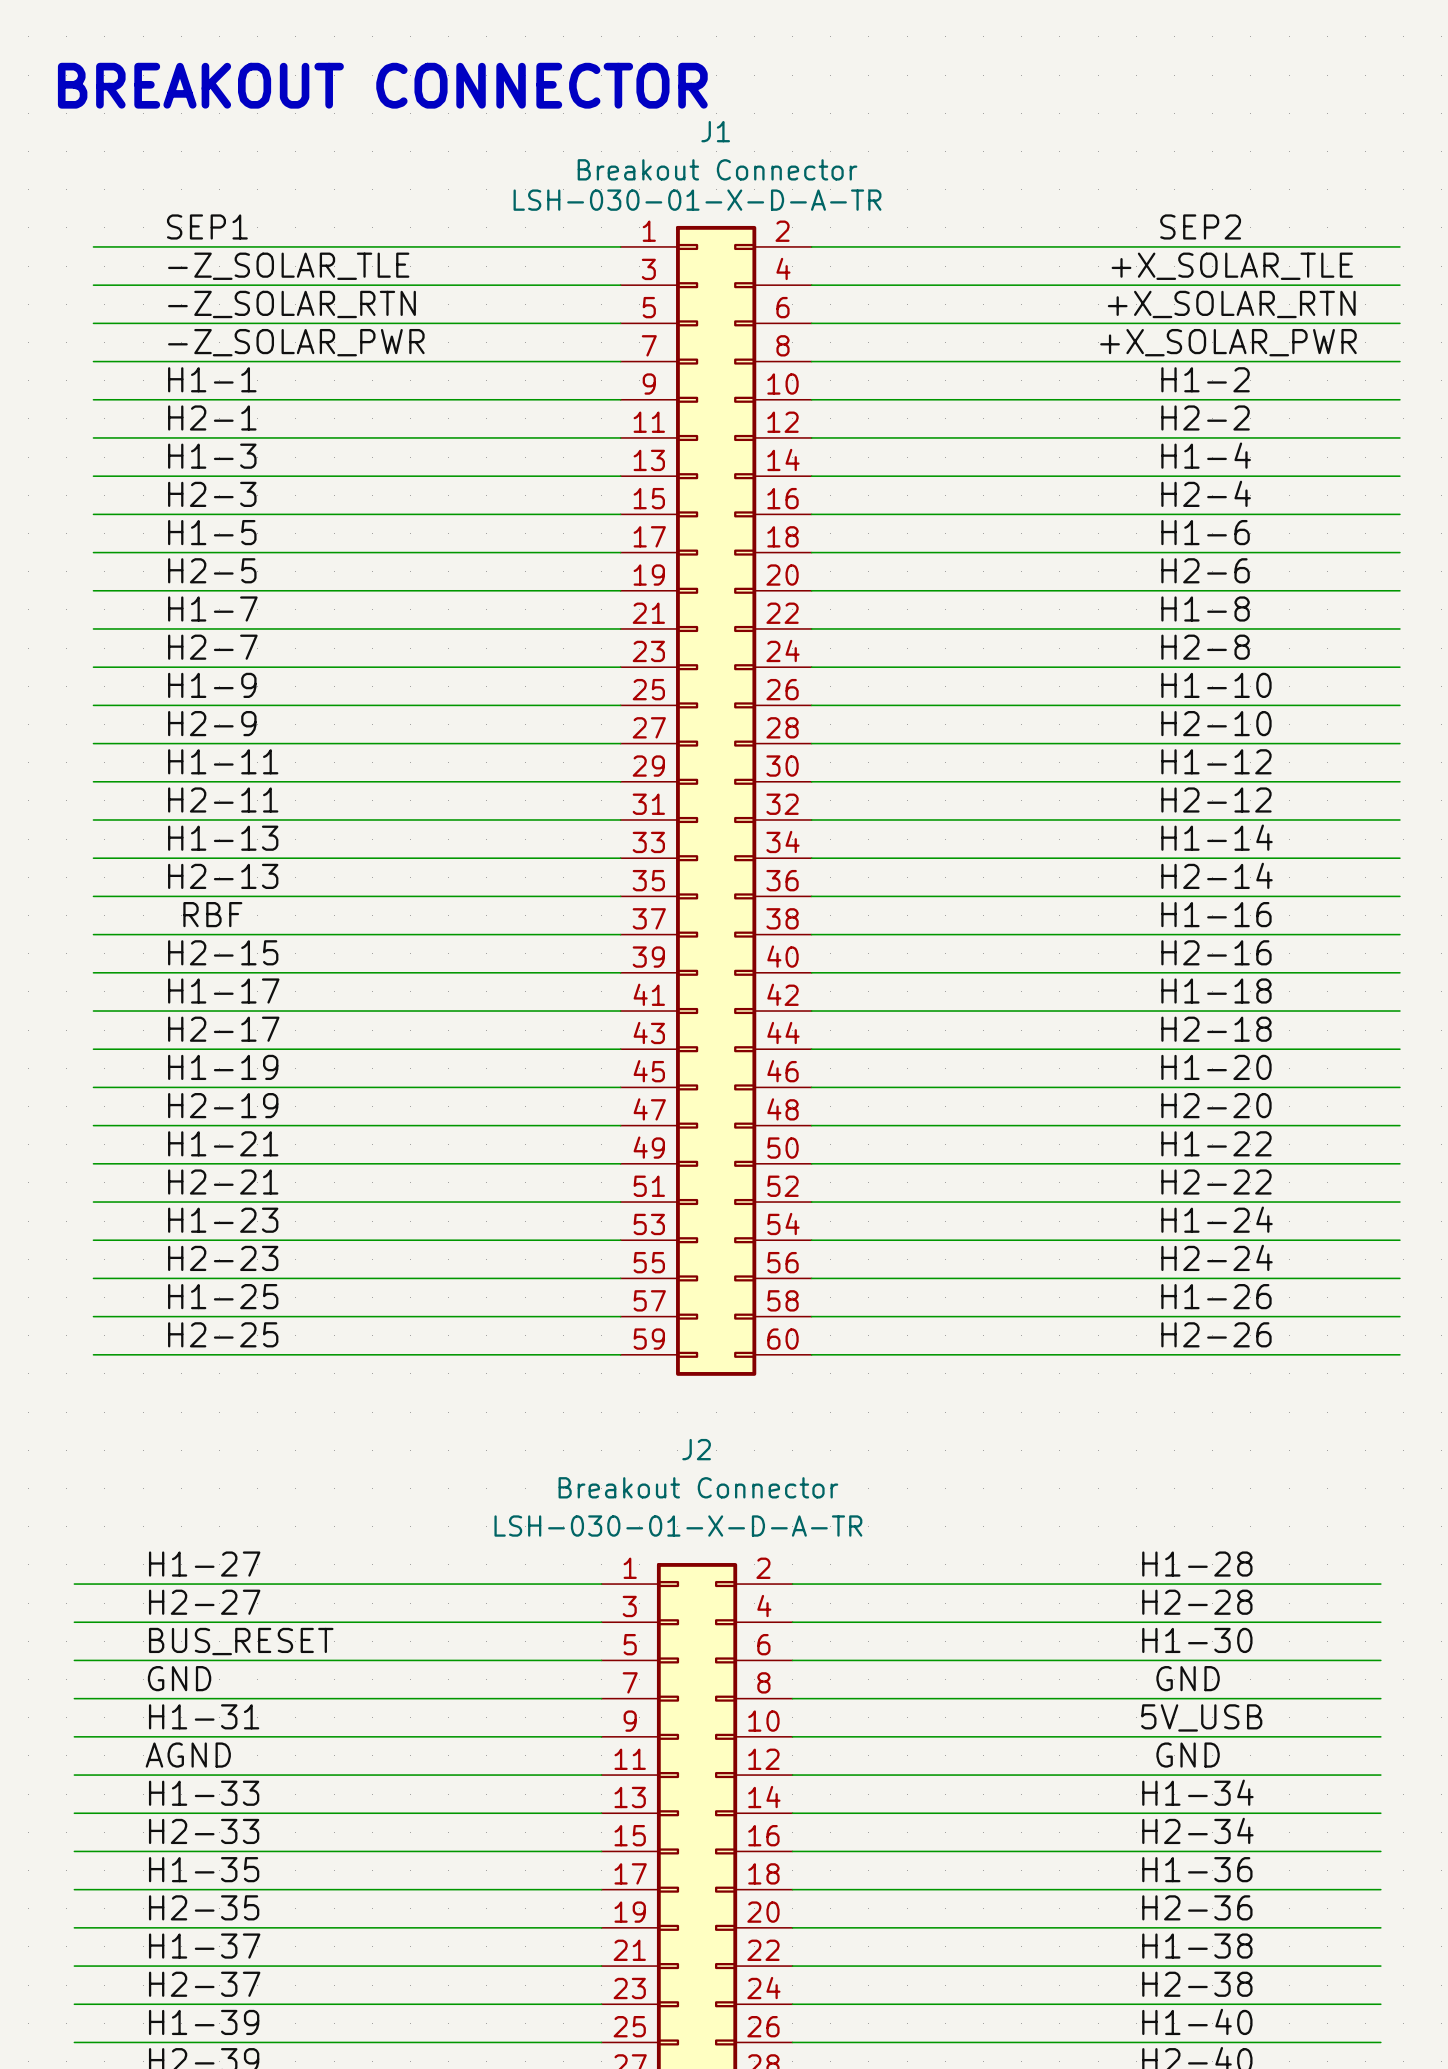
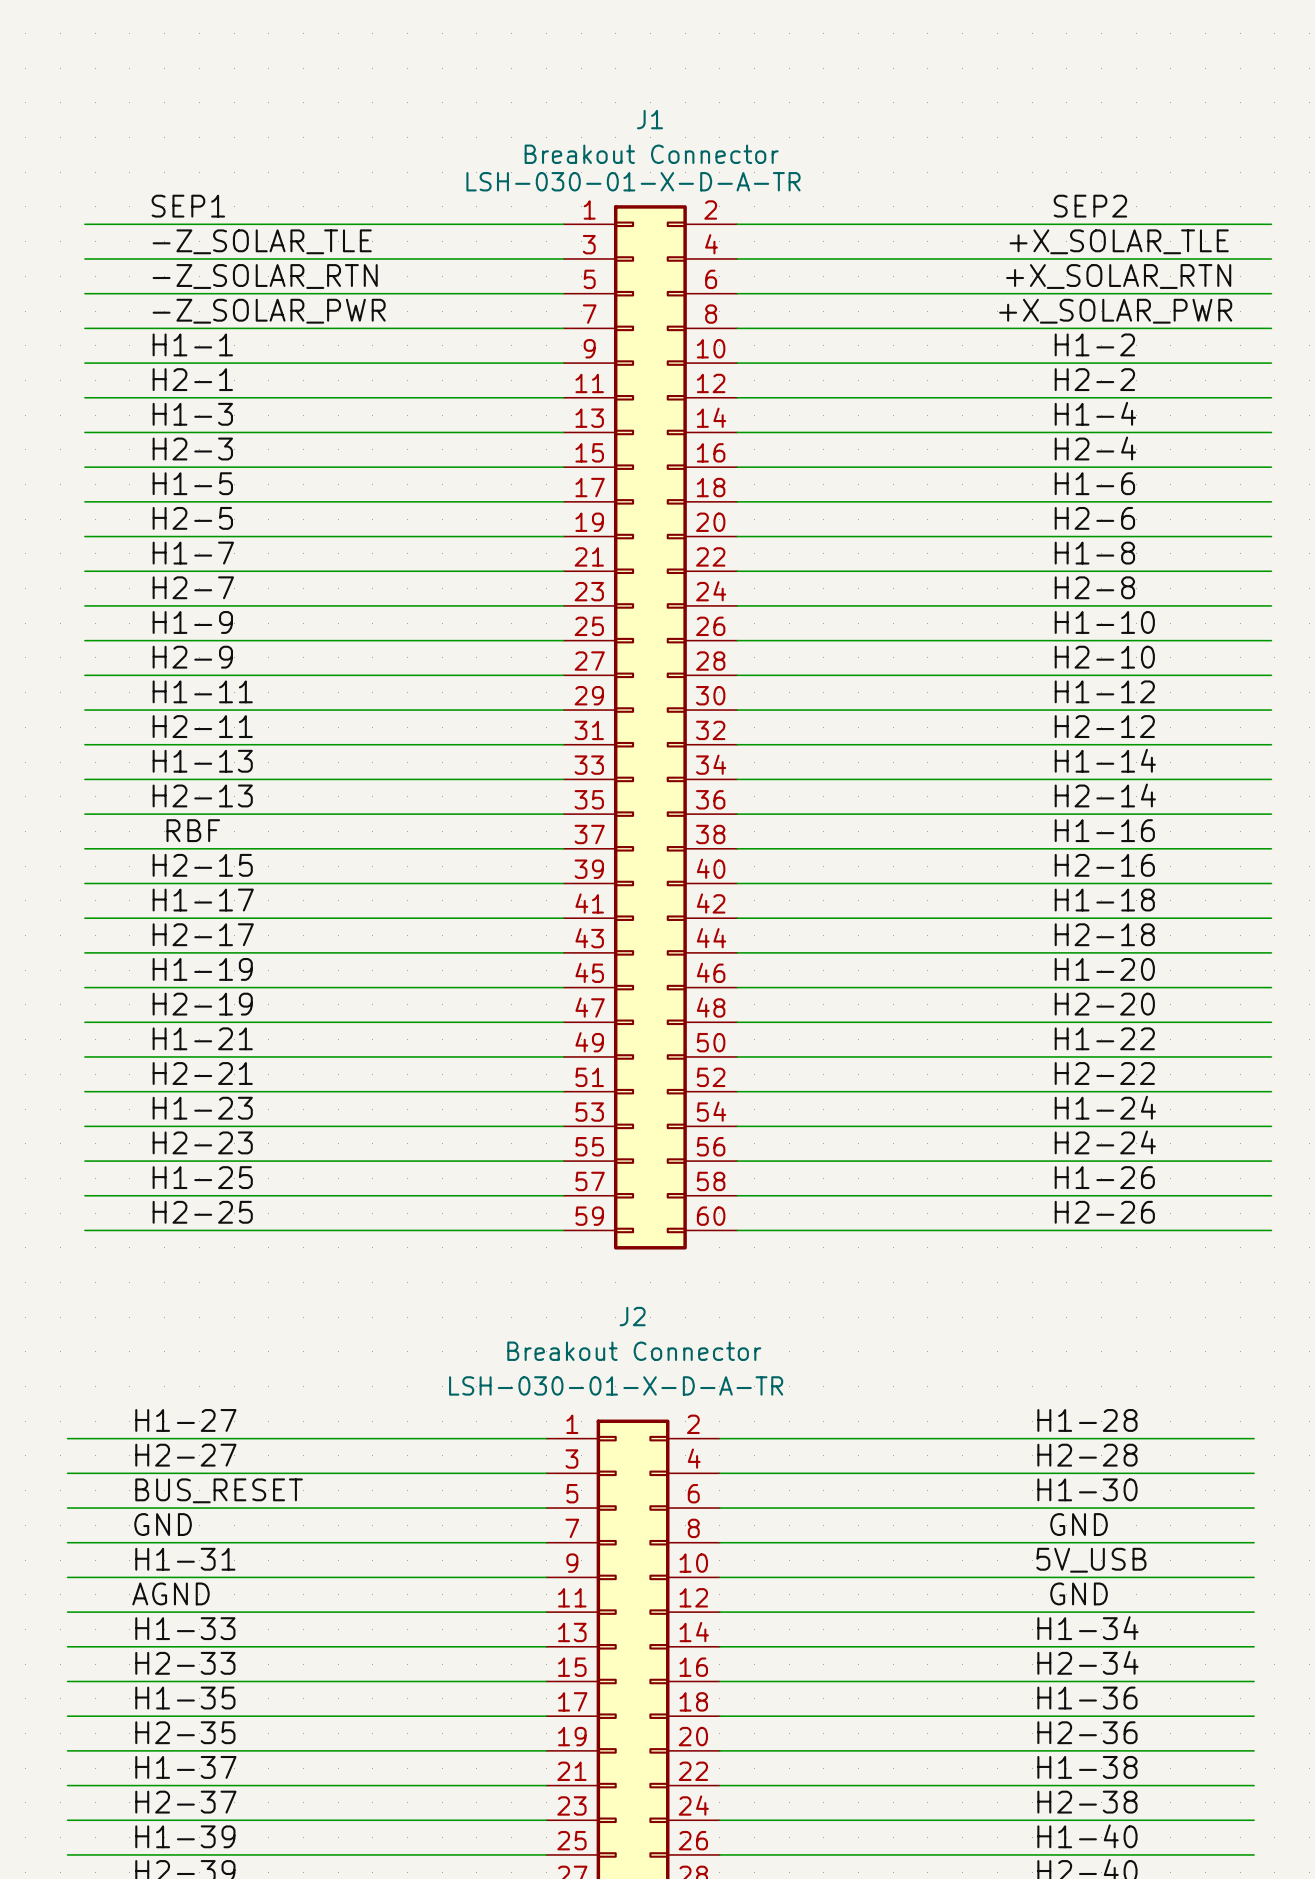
text: BREAKOUT CONNECTOR (382, 85) -> none

